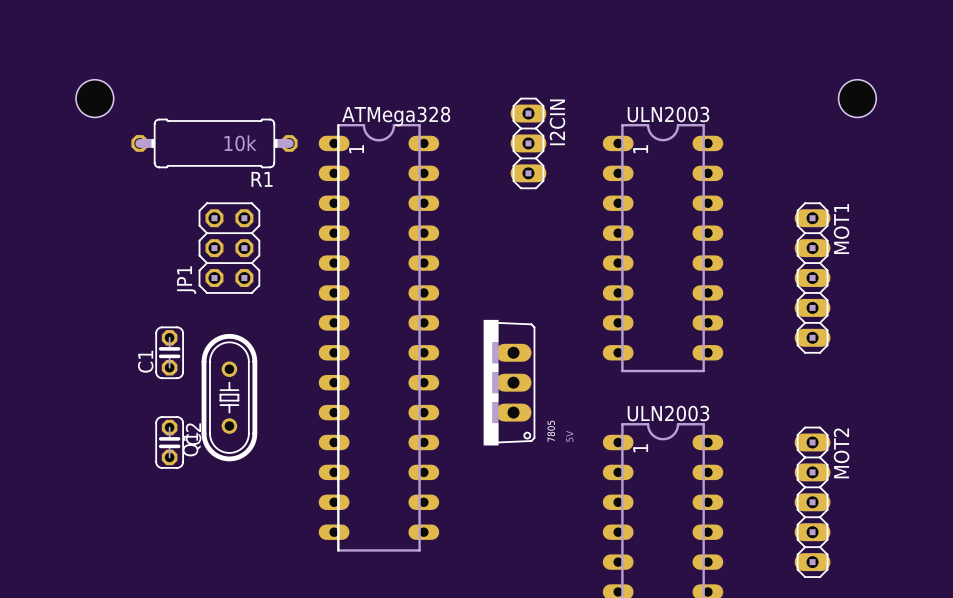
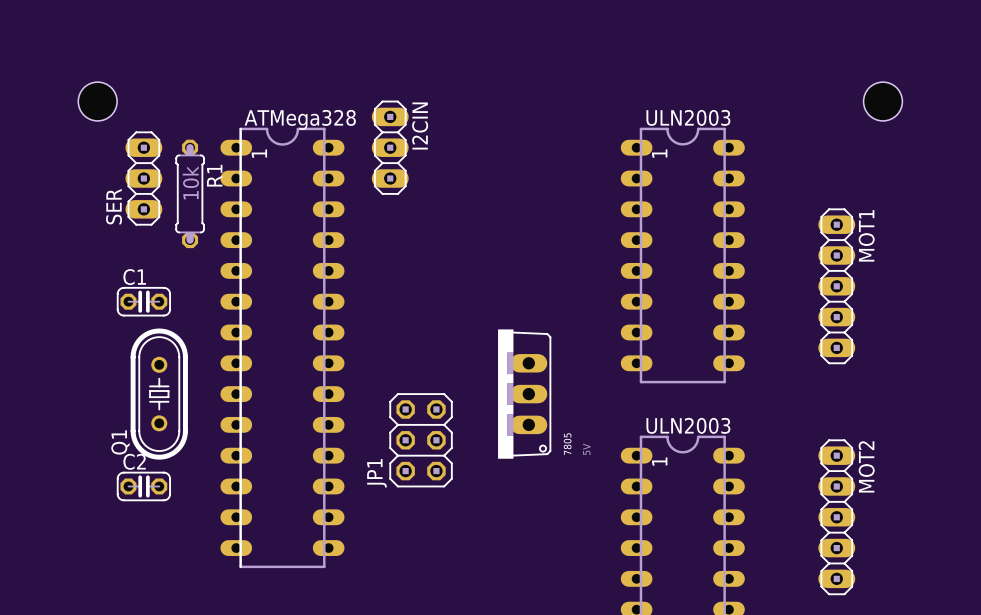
R1 footprint: [131, 118, 298, 169] -> [175, 139, 205, 249]
I2CIN position: (528, 143) -> (390, 147)
SER: none -> (143, 178)
R1 name position: R1 (262, 179) -> R1 (214, 175)
JP1 position: (229, 248) -> (421, 440)
part position: (378, 337) -> (282, 347)
C1 rotation: 0° (169, 352) -> 90° clockwise (143, 301)
C1 position: (169, 352) -> (143, 301)
Q1 position: (229, 397) -> (159, 394)
C2 rotation: 0° (169, 442) -> 90° counterclockwise (143, 486)
C2 position: (169, 442) -> (143, 486)

